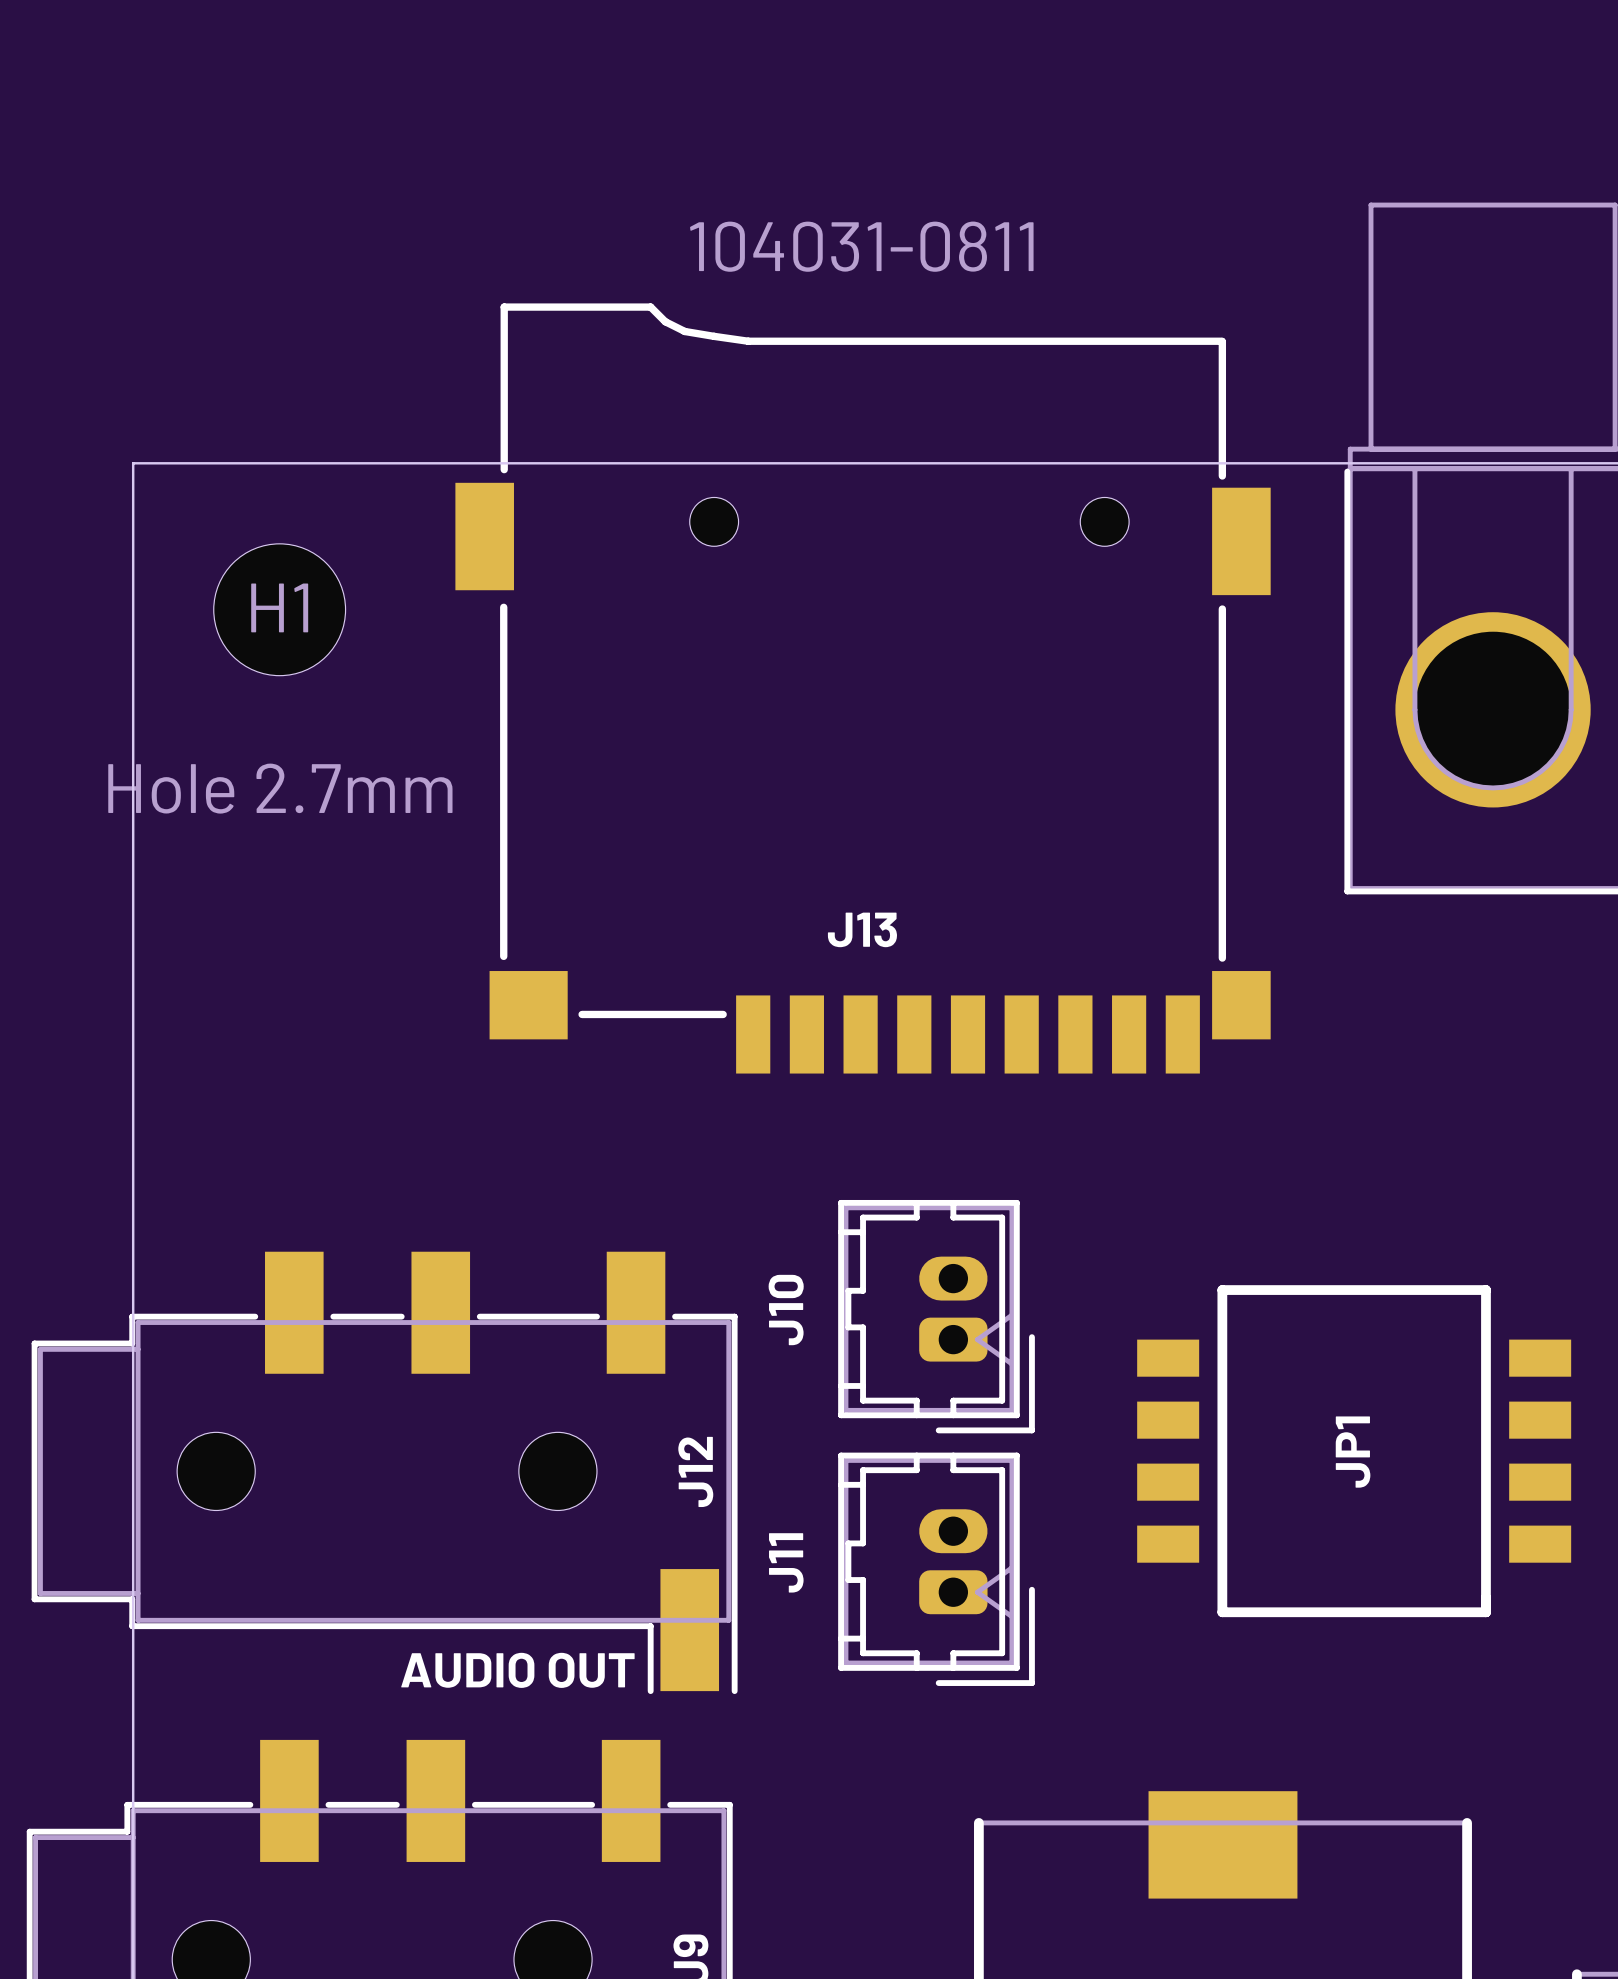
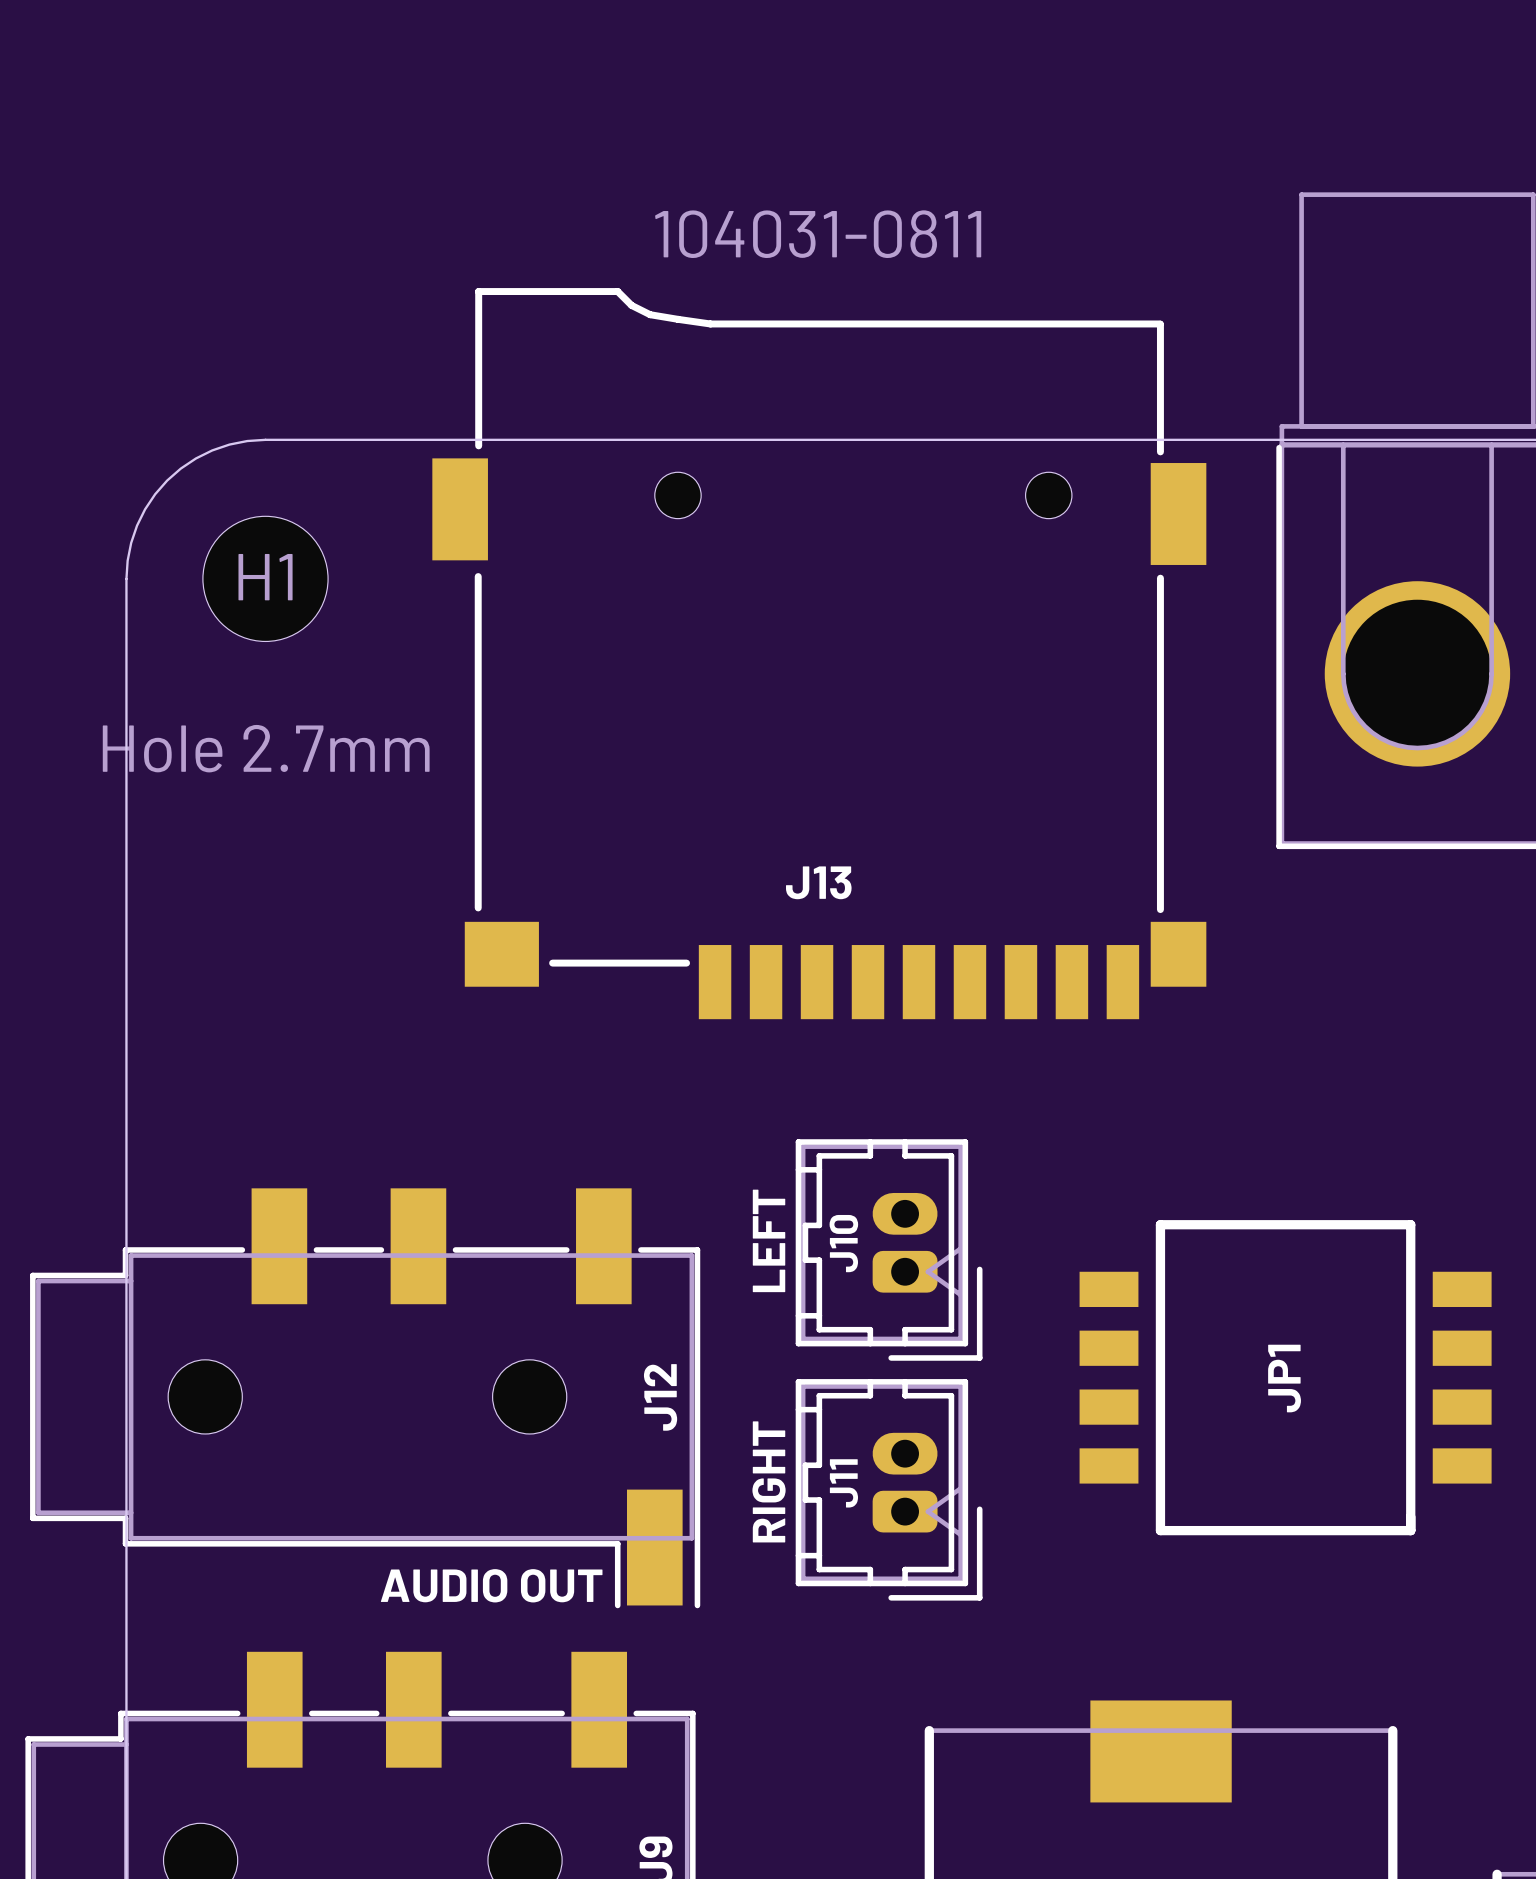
board edge: (279, 463) (133, 463) (133, 609) -> (265, 439) (229, 444) (212, 450) (180, 468) (167, 480) (145, 509) (137, 525) (127, 560) (126, 578)
text: none -> LEFT (769, 1240)
J10 name position: J10 (786, 1310) -> J10 (843, 1243)
text: none -> RIGHT (769, 1481)
J11 name position: J11 (786, 1562) -> J11 (843, 1483)

